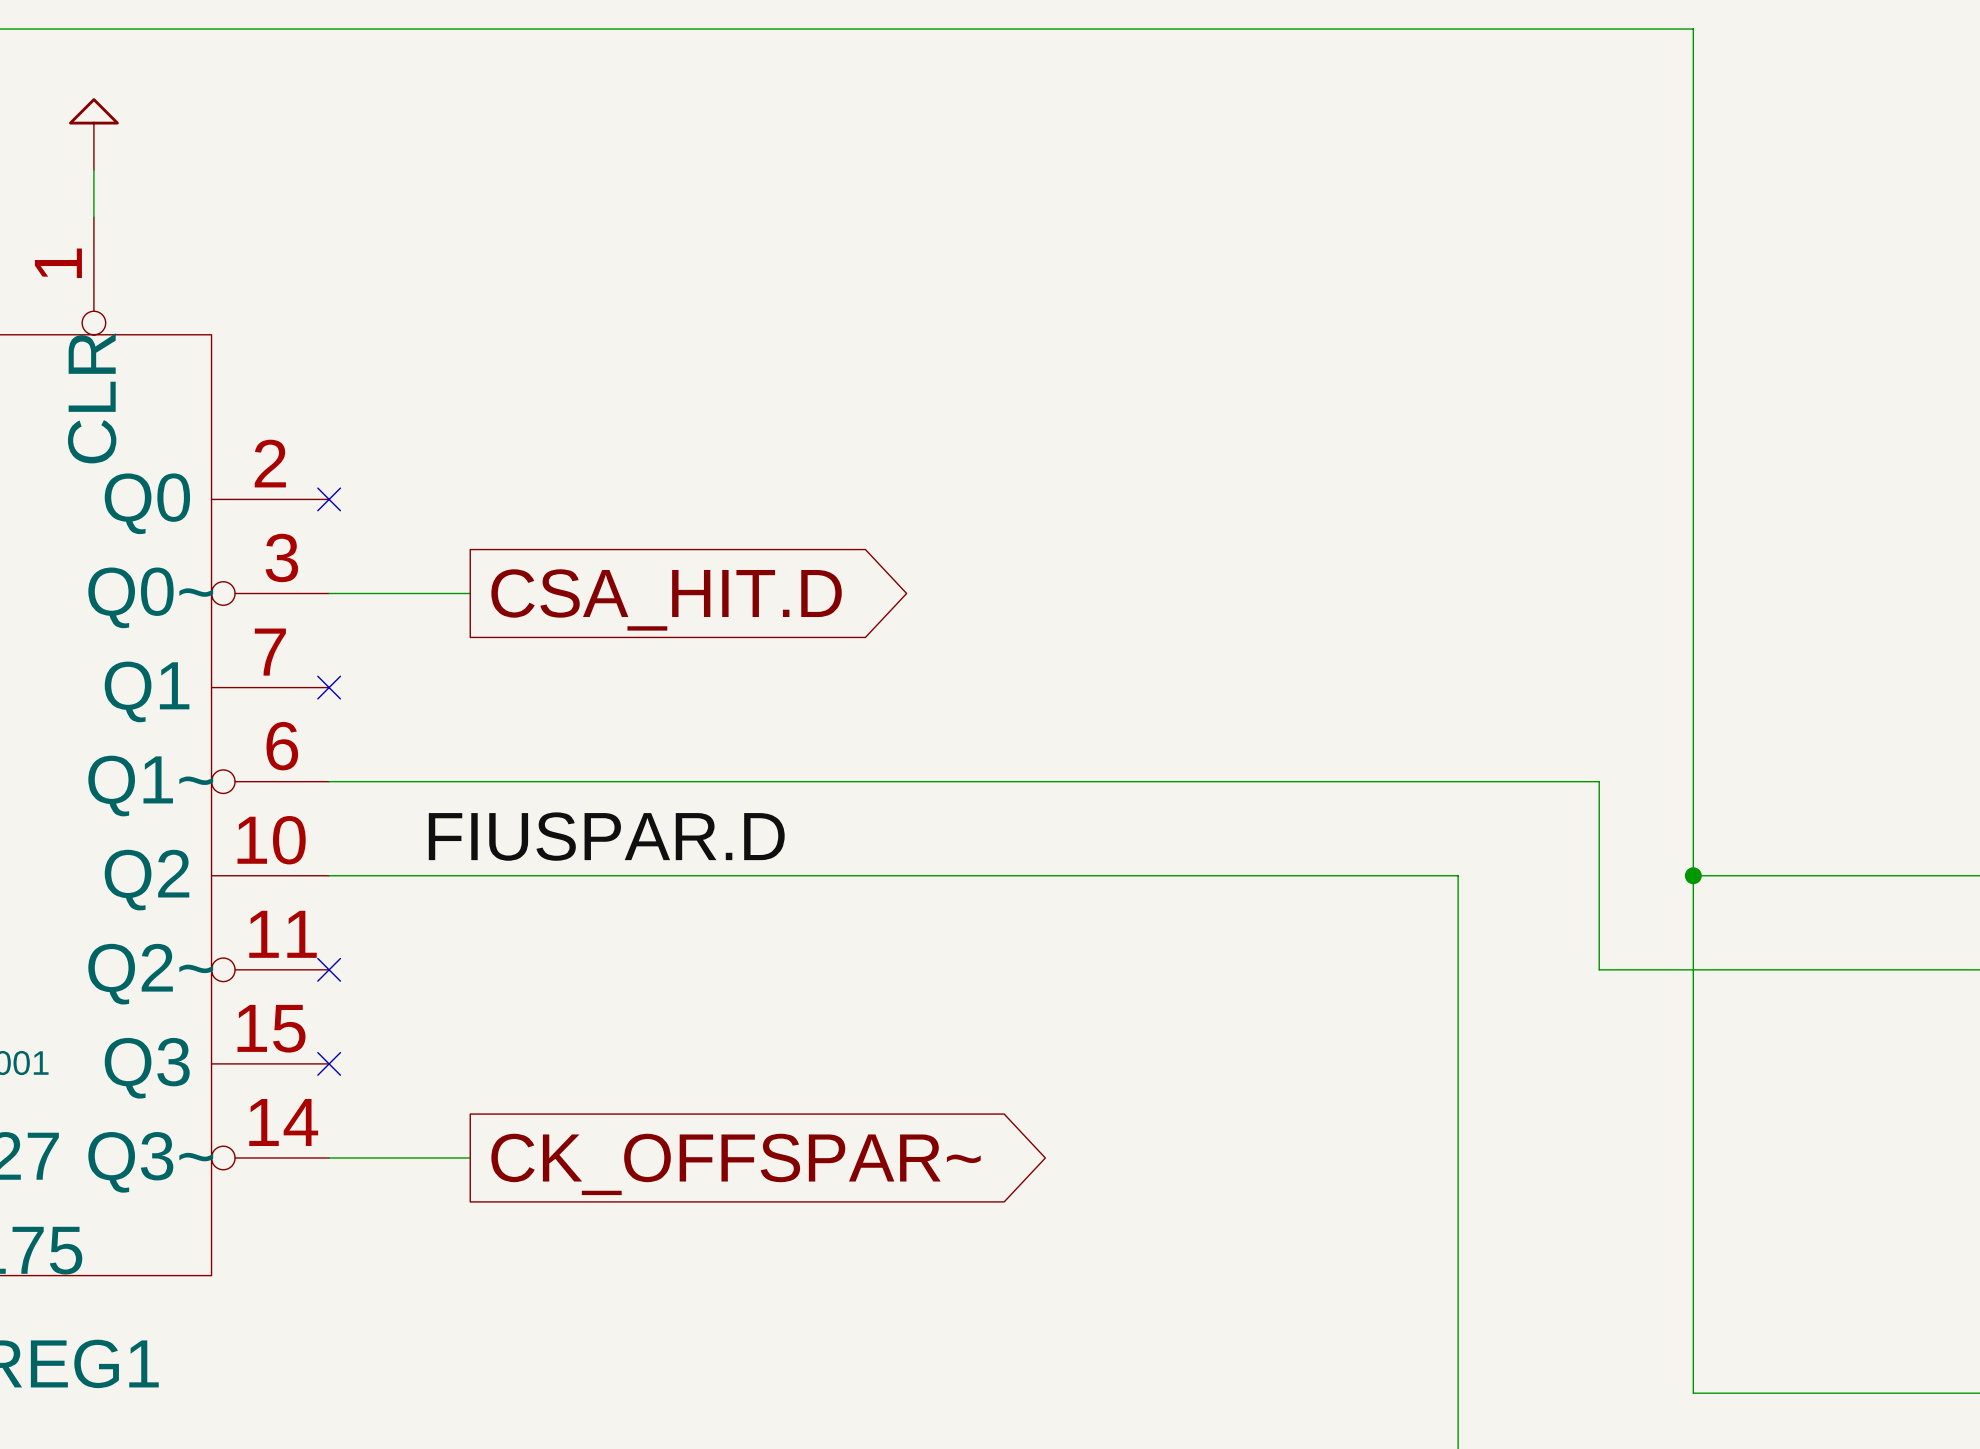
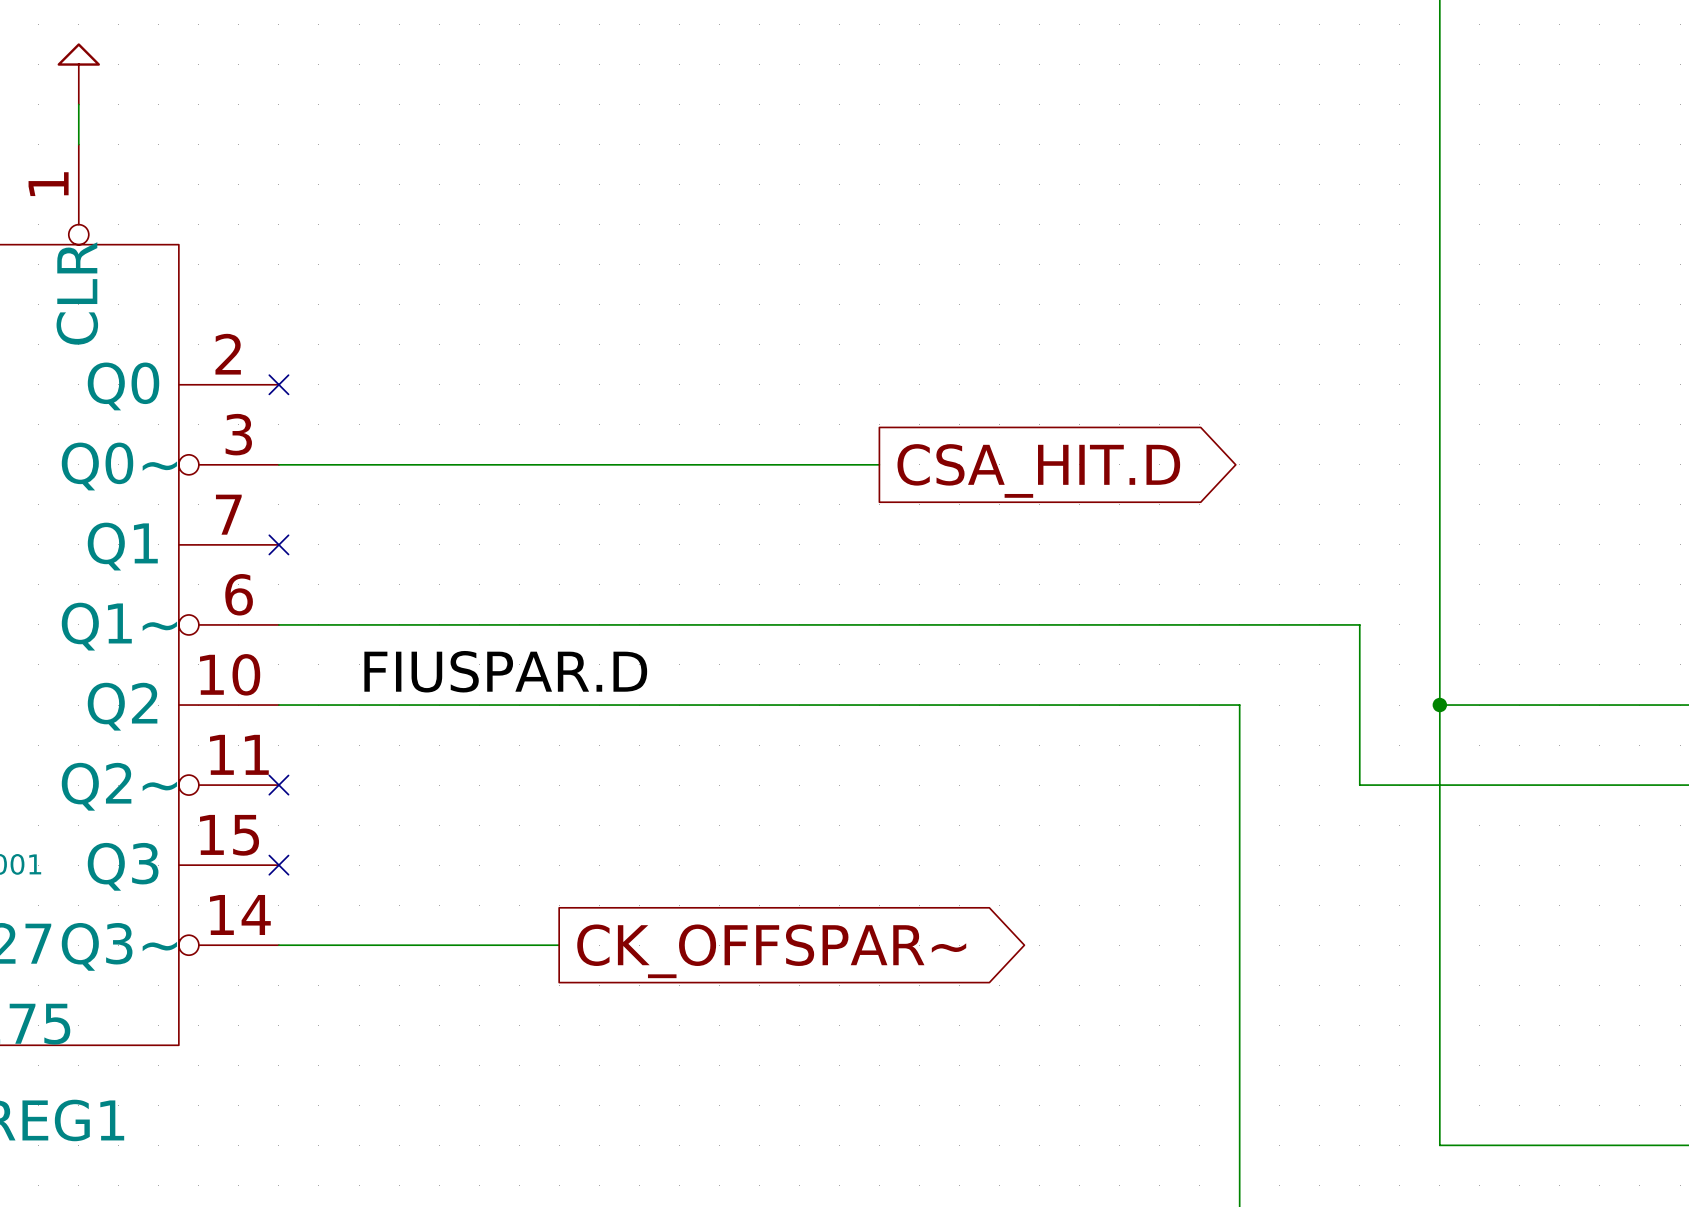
wire: none -> (399, 464) (879, 464)
global label: CSA_HIT.D (666, 599) -> none
global label: none -> CSA_HIT.D (1038, 470)
wire: none -> (399, 945) (559, 945)
global label position: CK_OFFSPAR~ (736, 1164) -> CK_OFFSPAR~ (771, 951)

